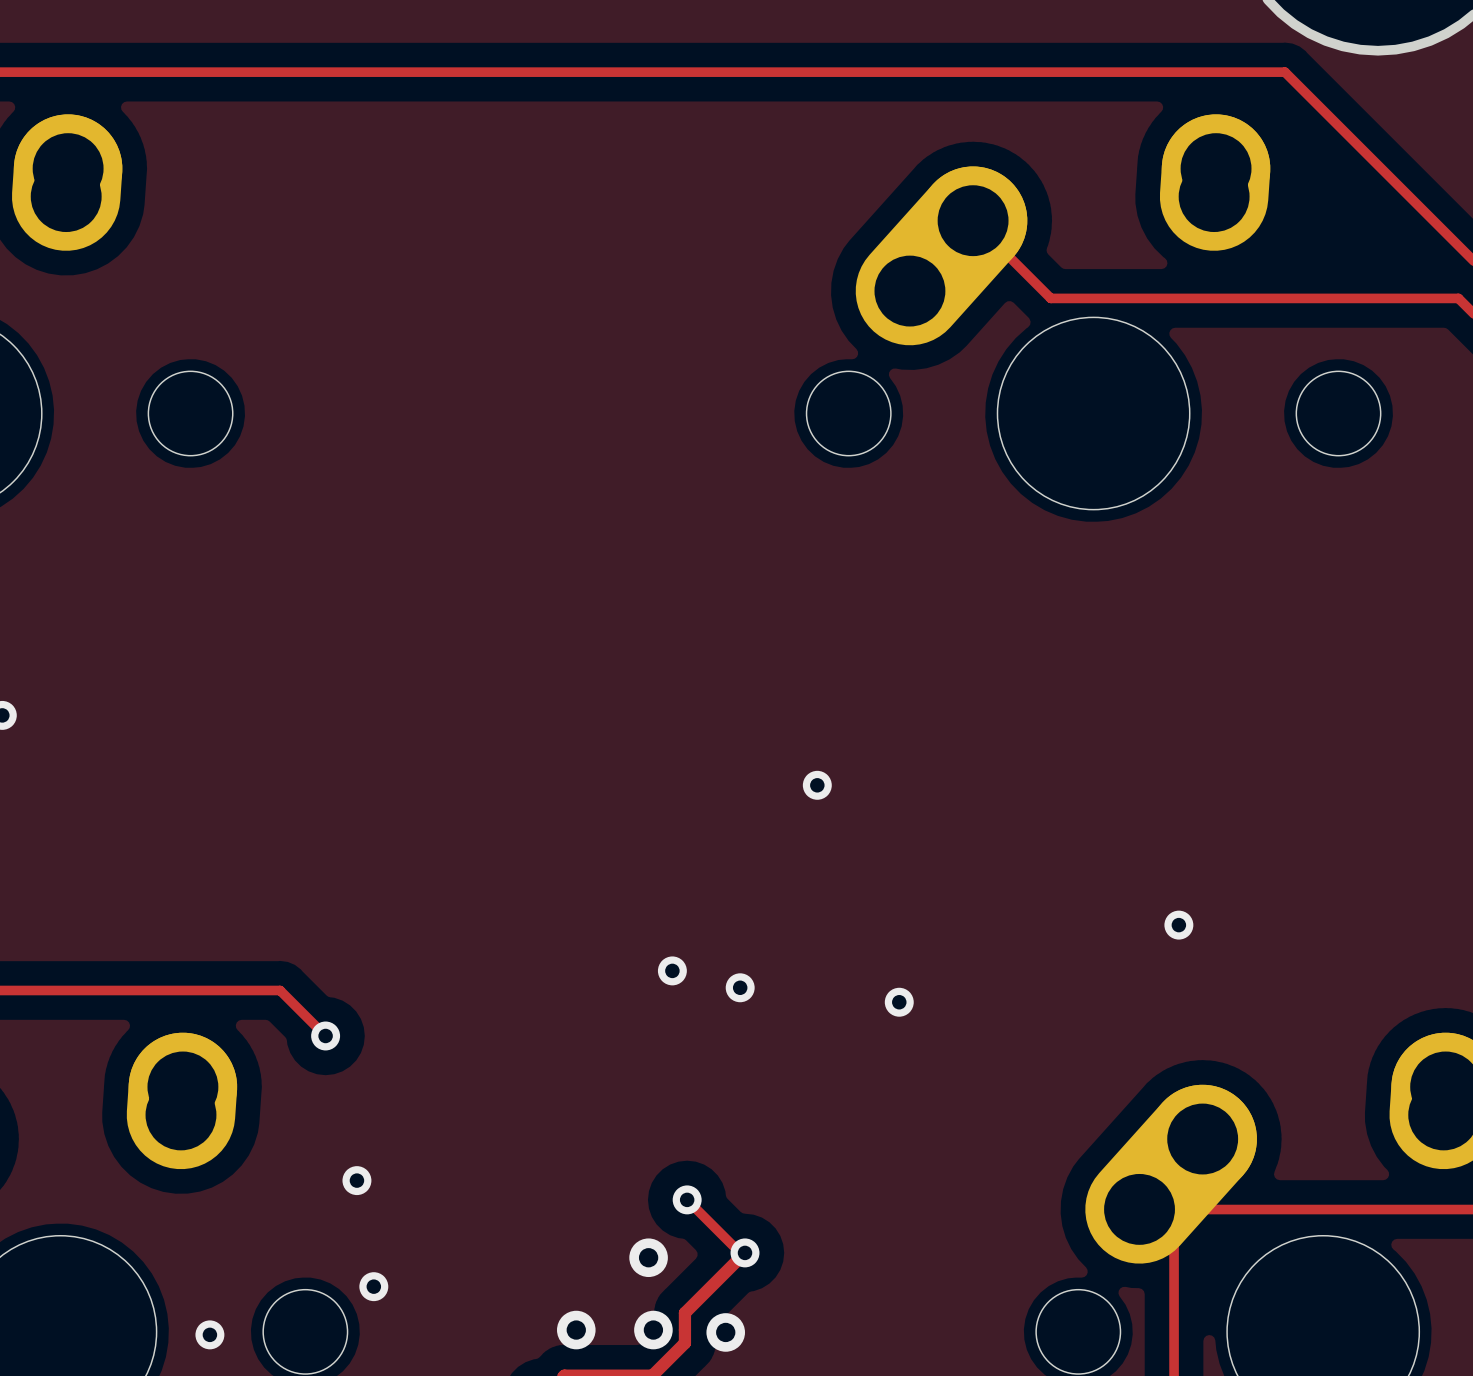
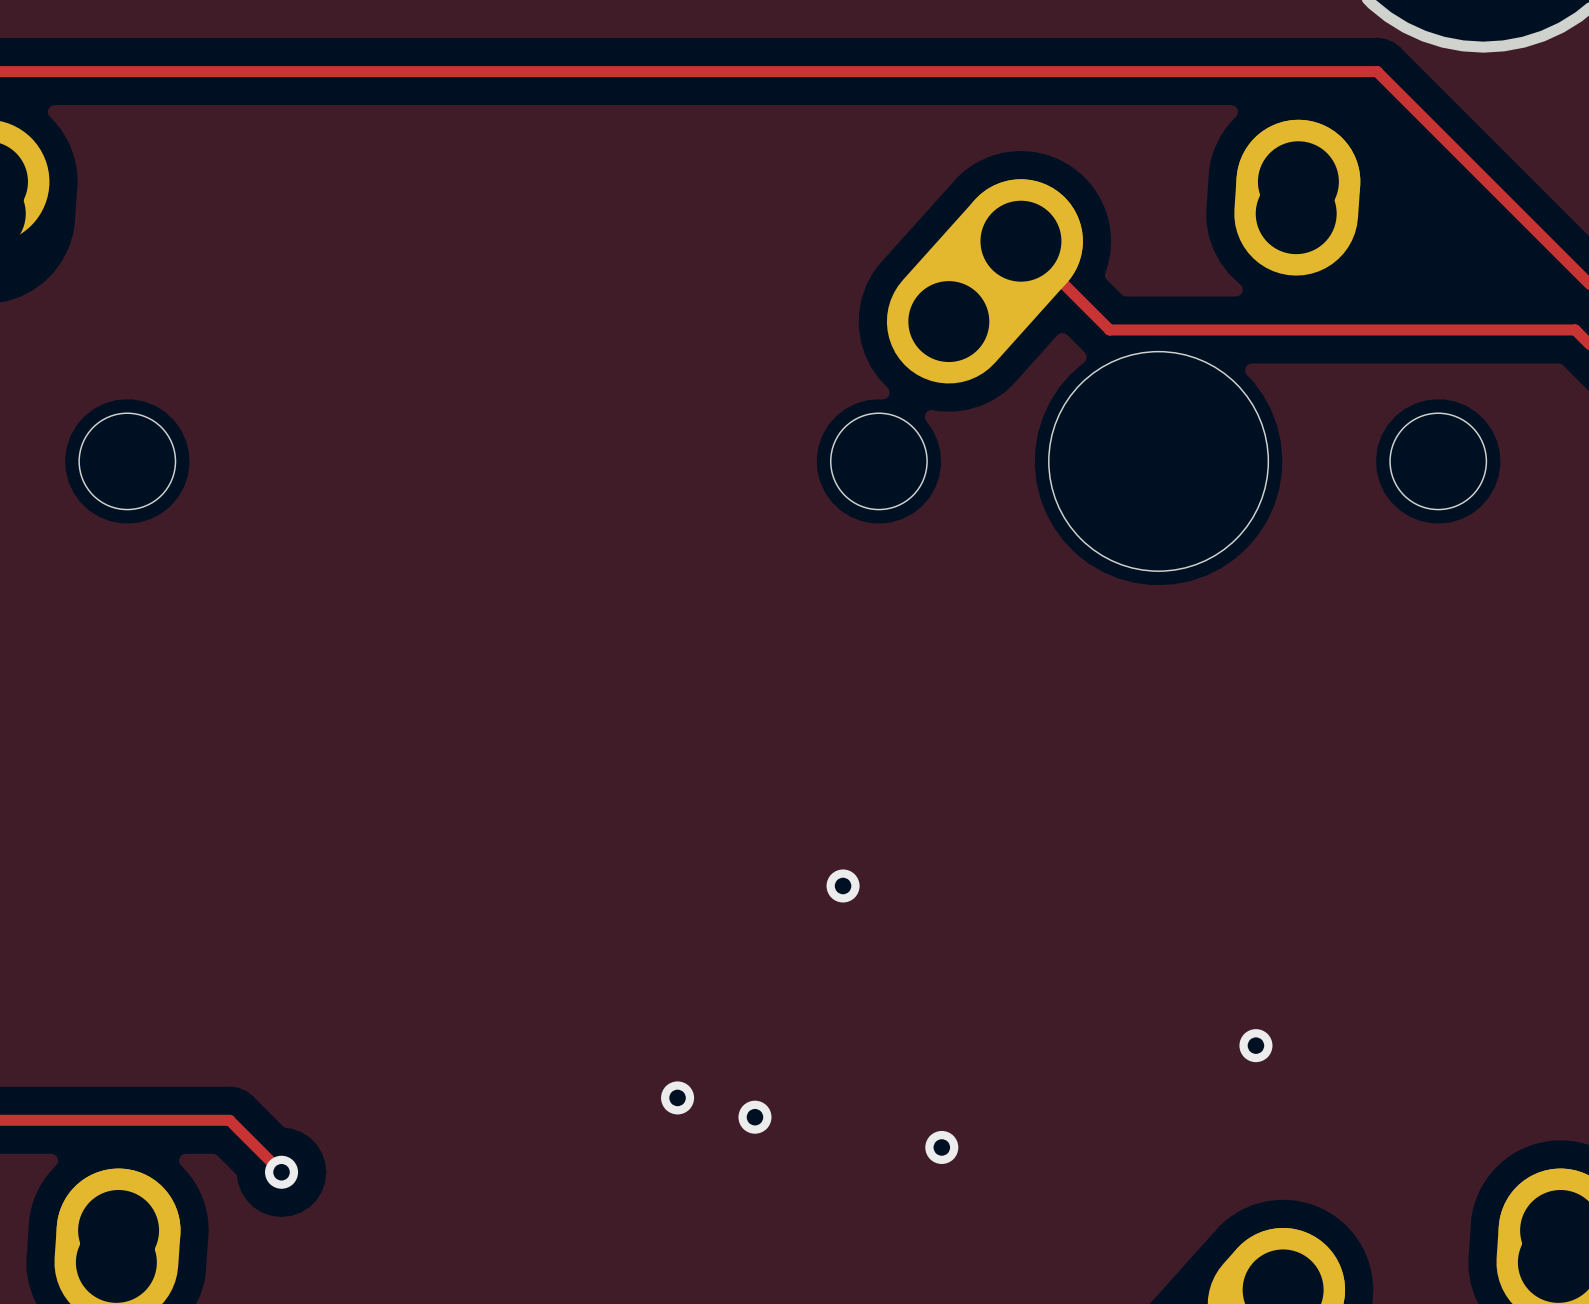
via position: (899, 1002) -> (941, 1147)

